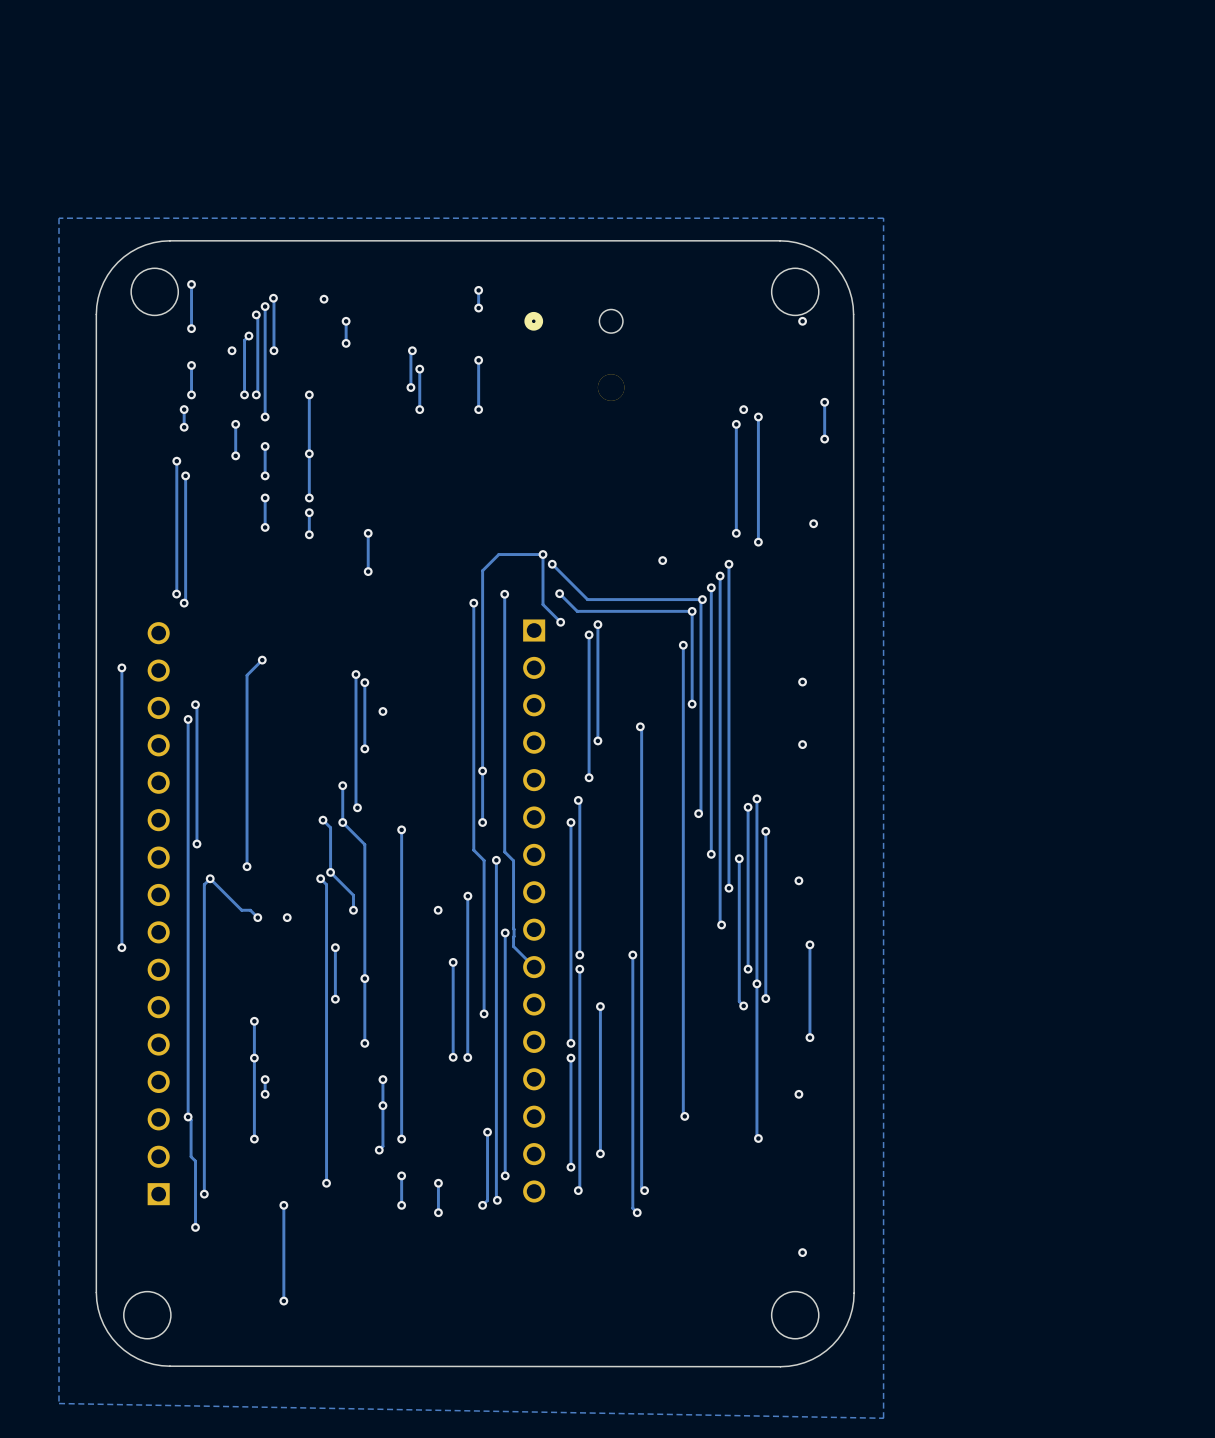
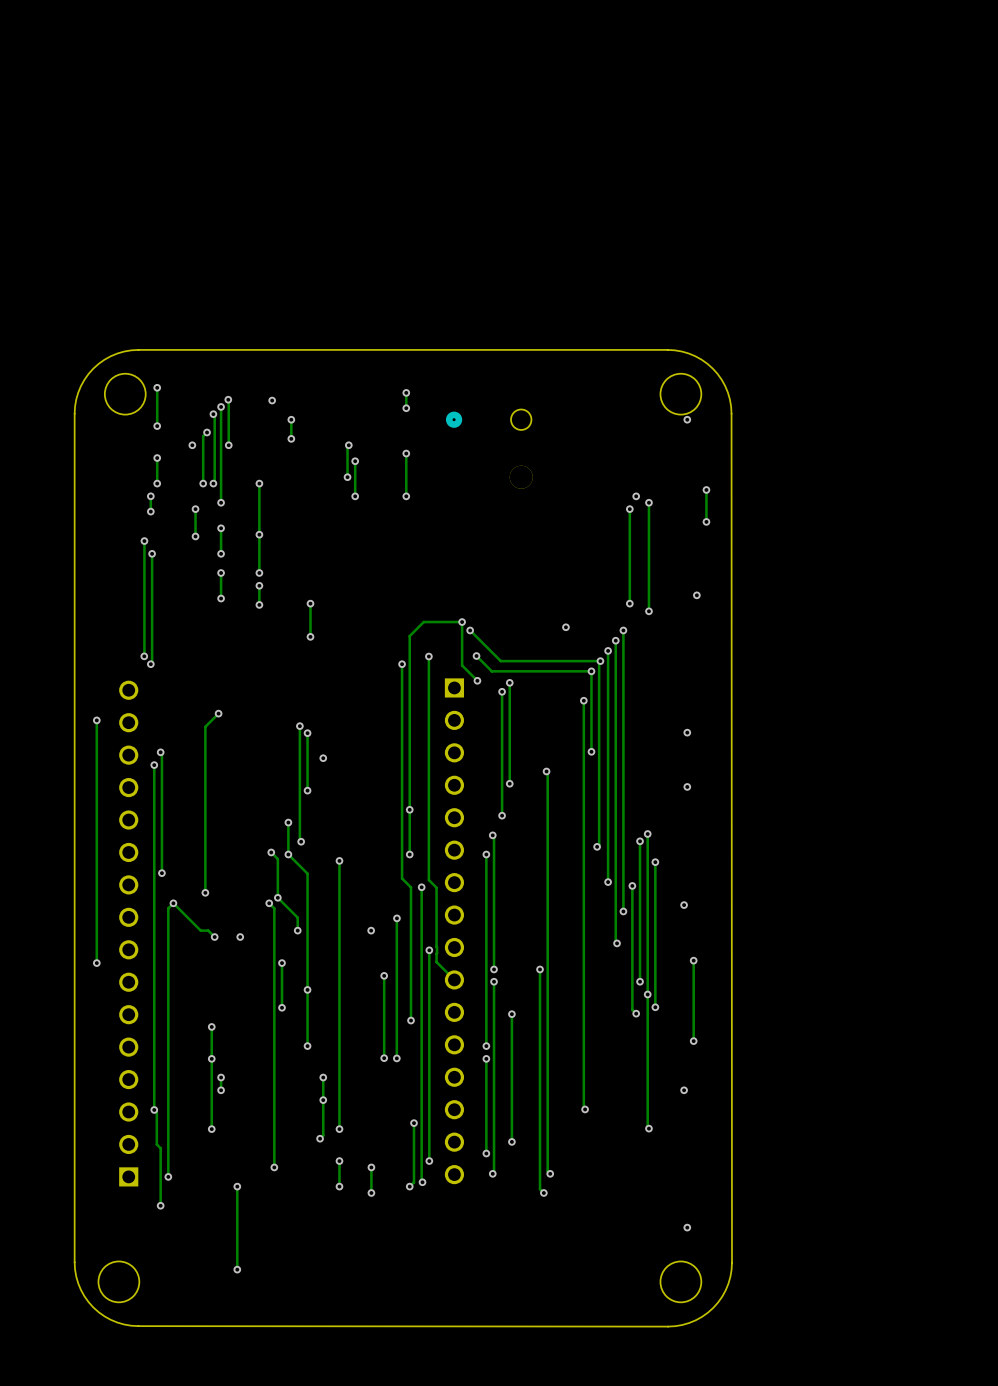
zone outline: (883, 218) (59, 218) (59, 1403) (883, 1418) (883, 218) -> none

